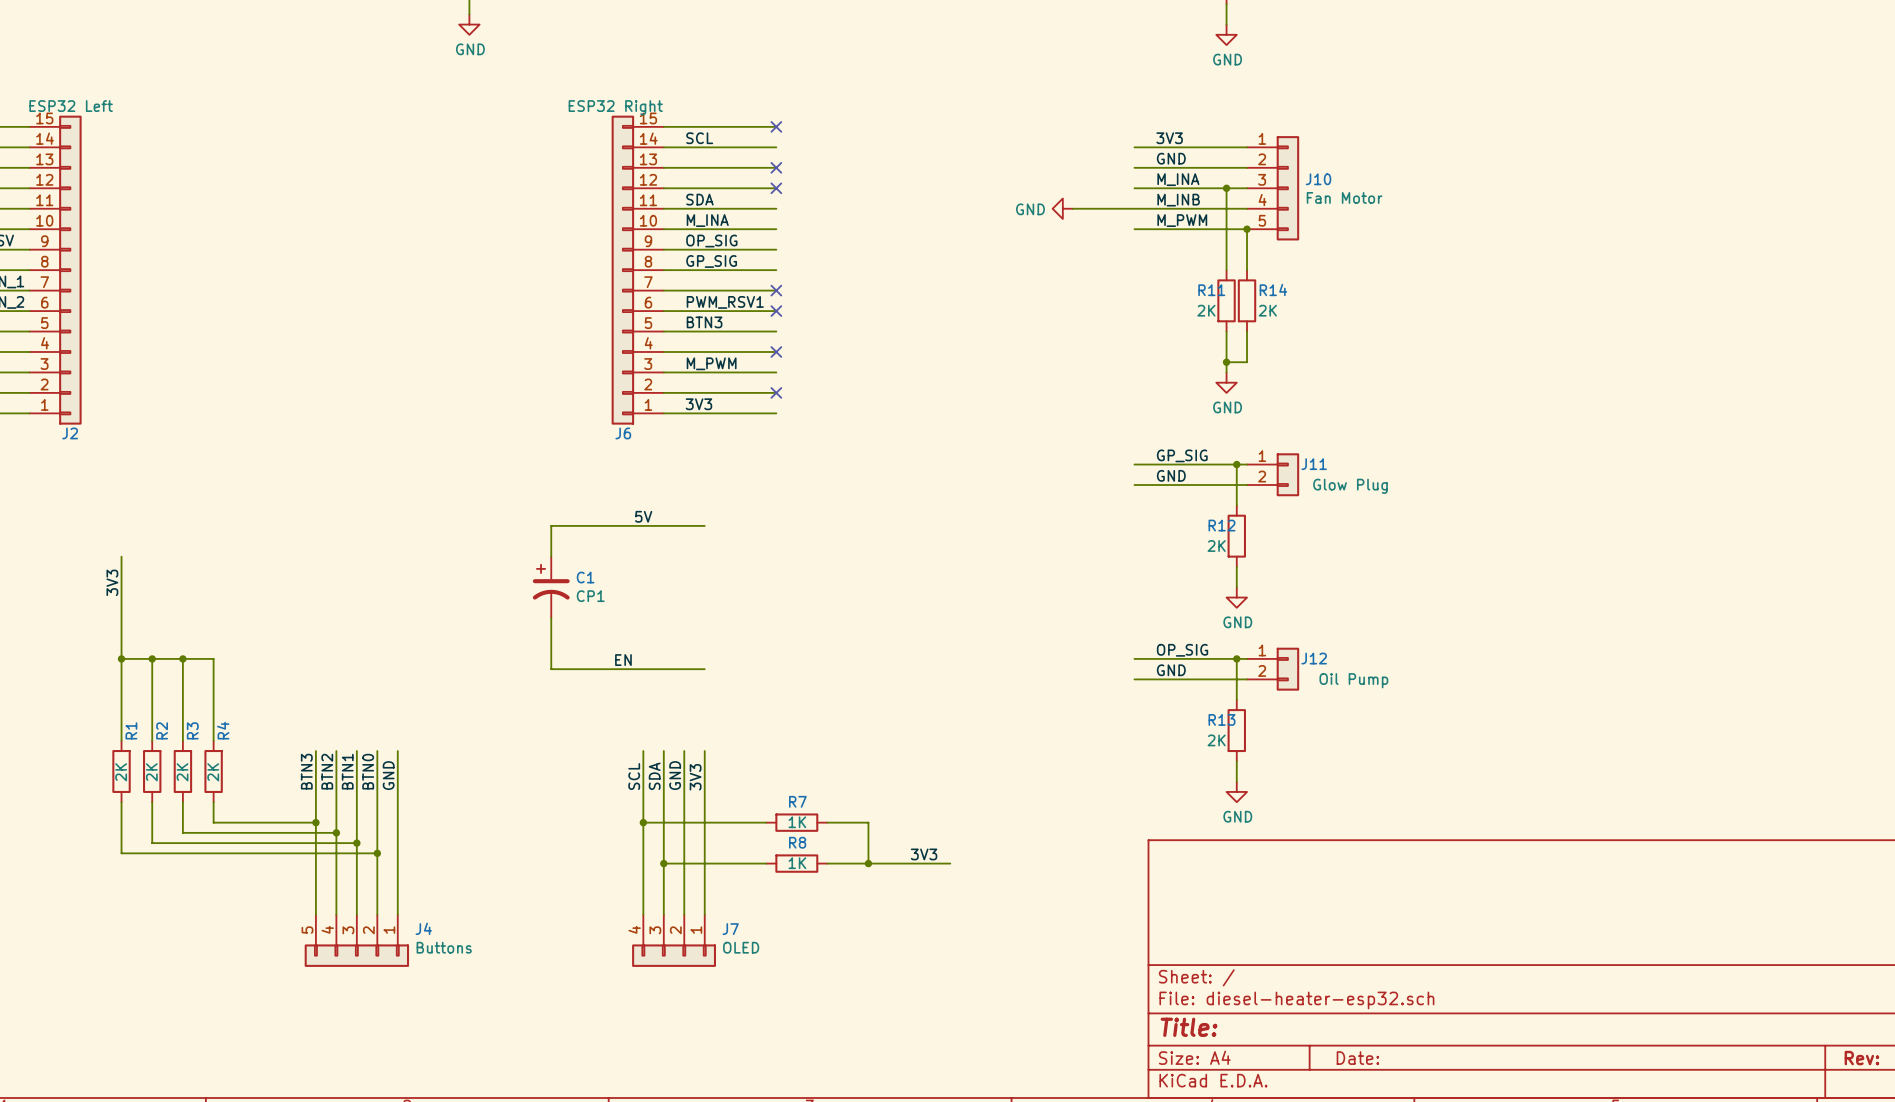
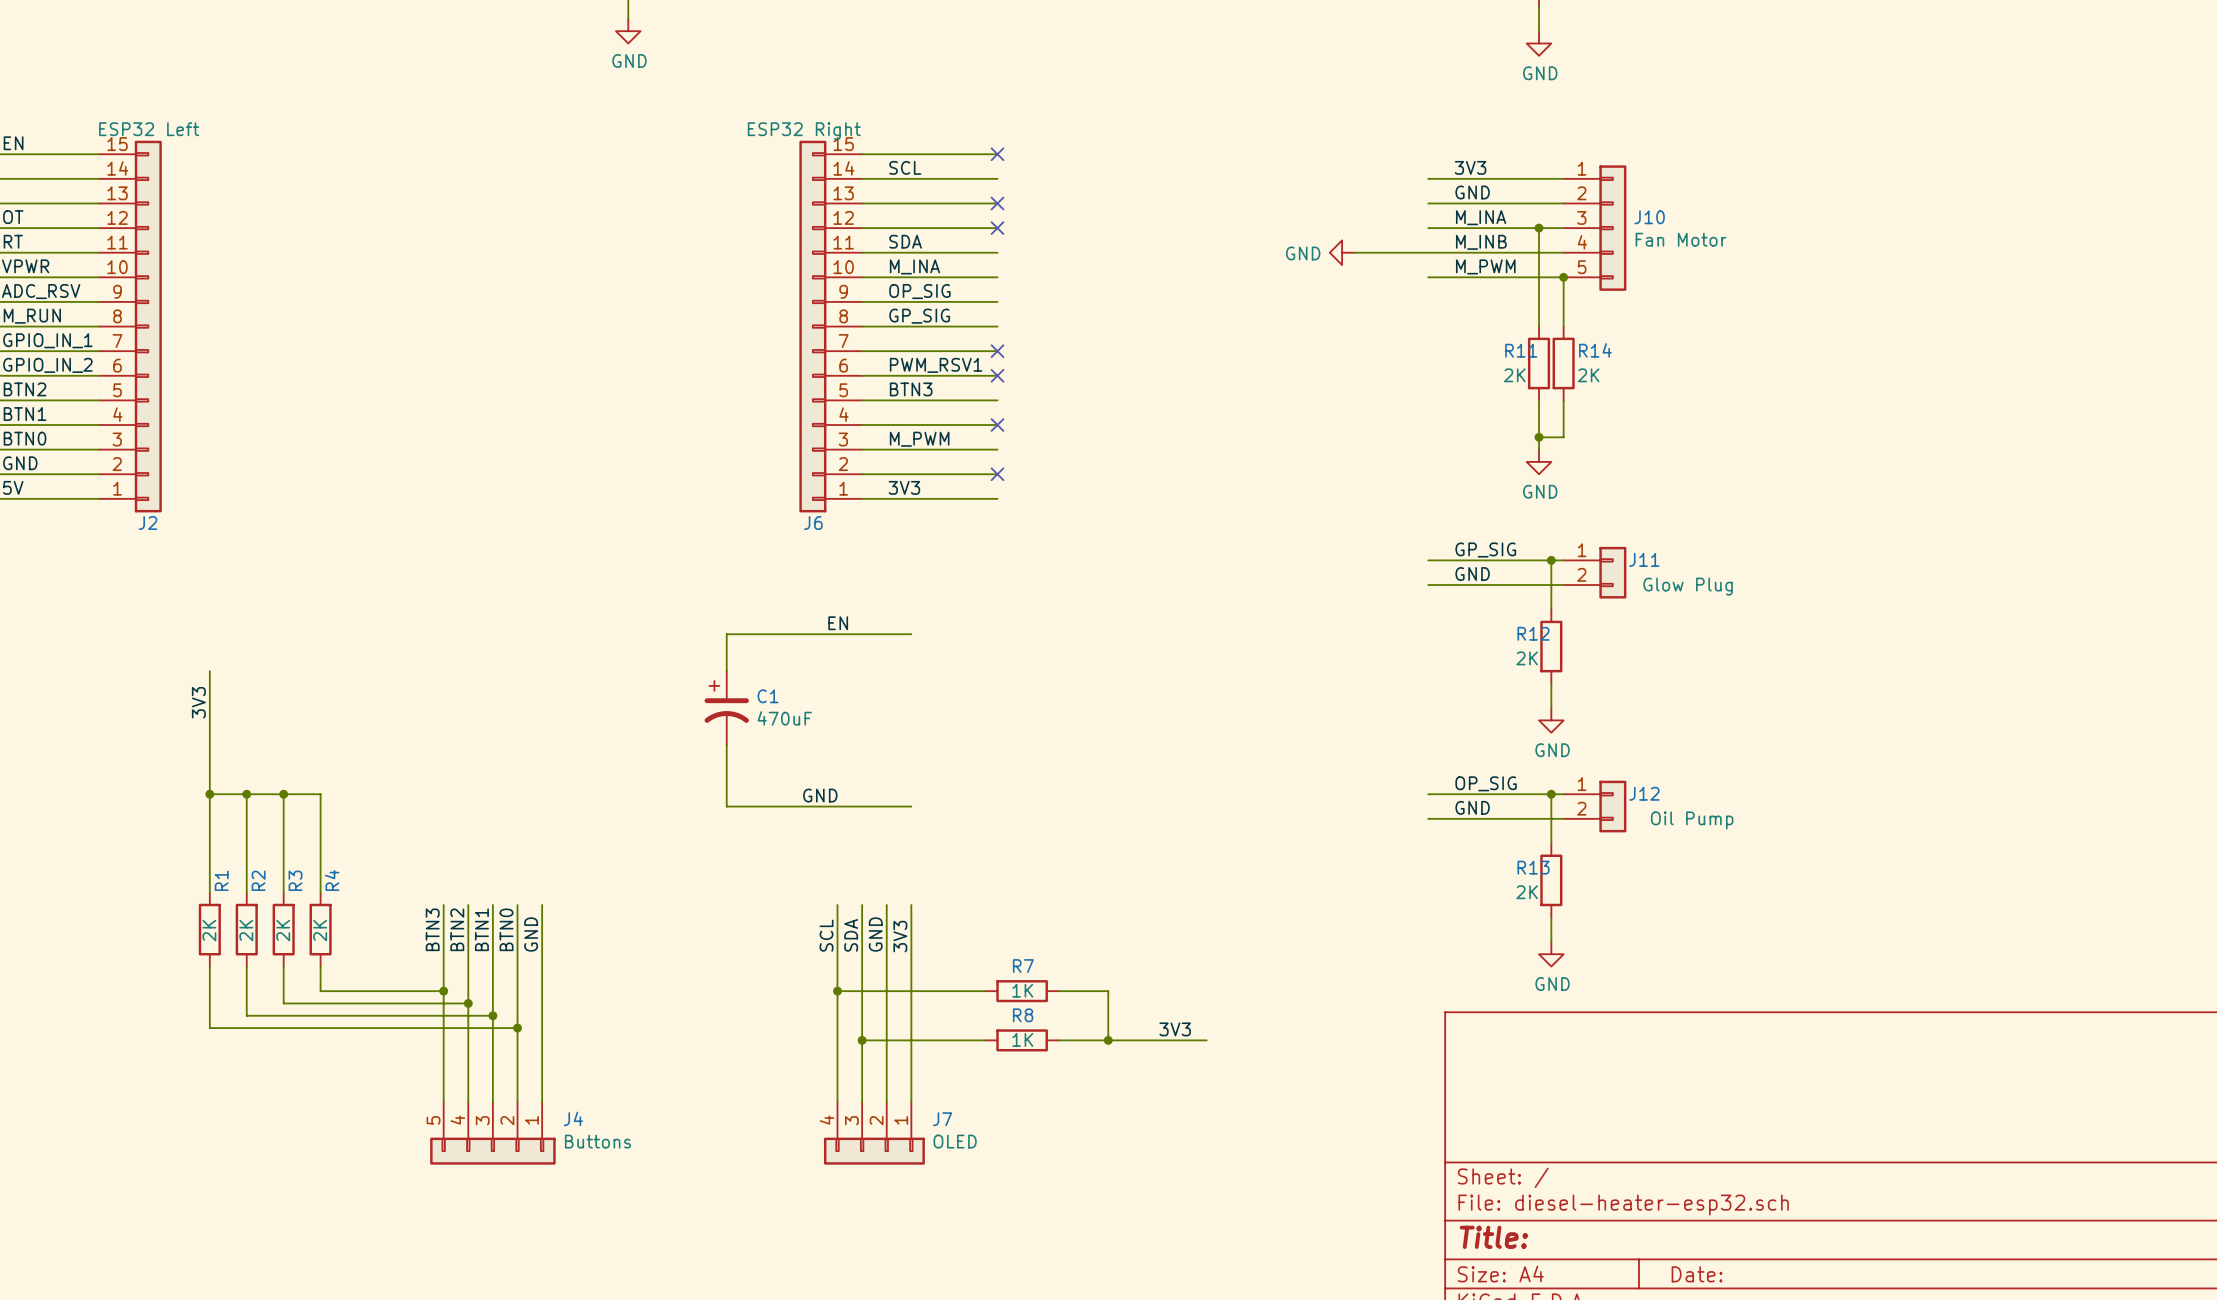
label: 5V (643, 516) -> EN (838, 623)
C1 value: CP1 (590, 596) -> 470uF (784, 718)
label: EN (623, 660) -> GND (820, 795)

